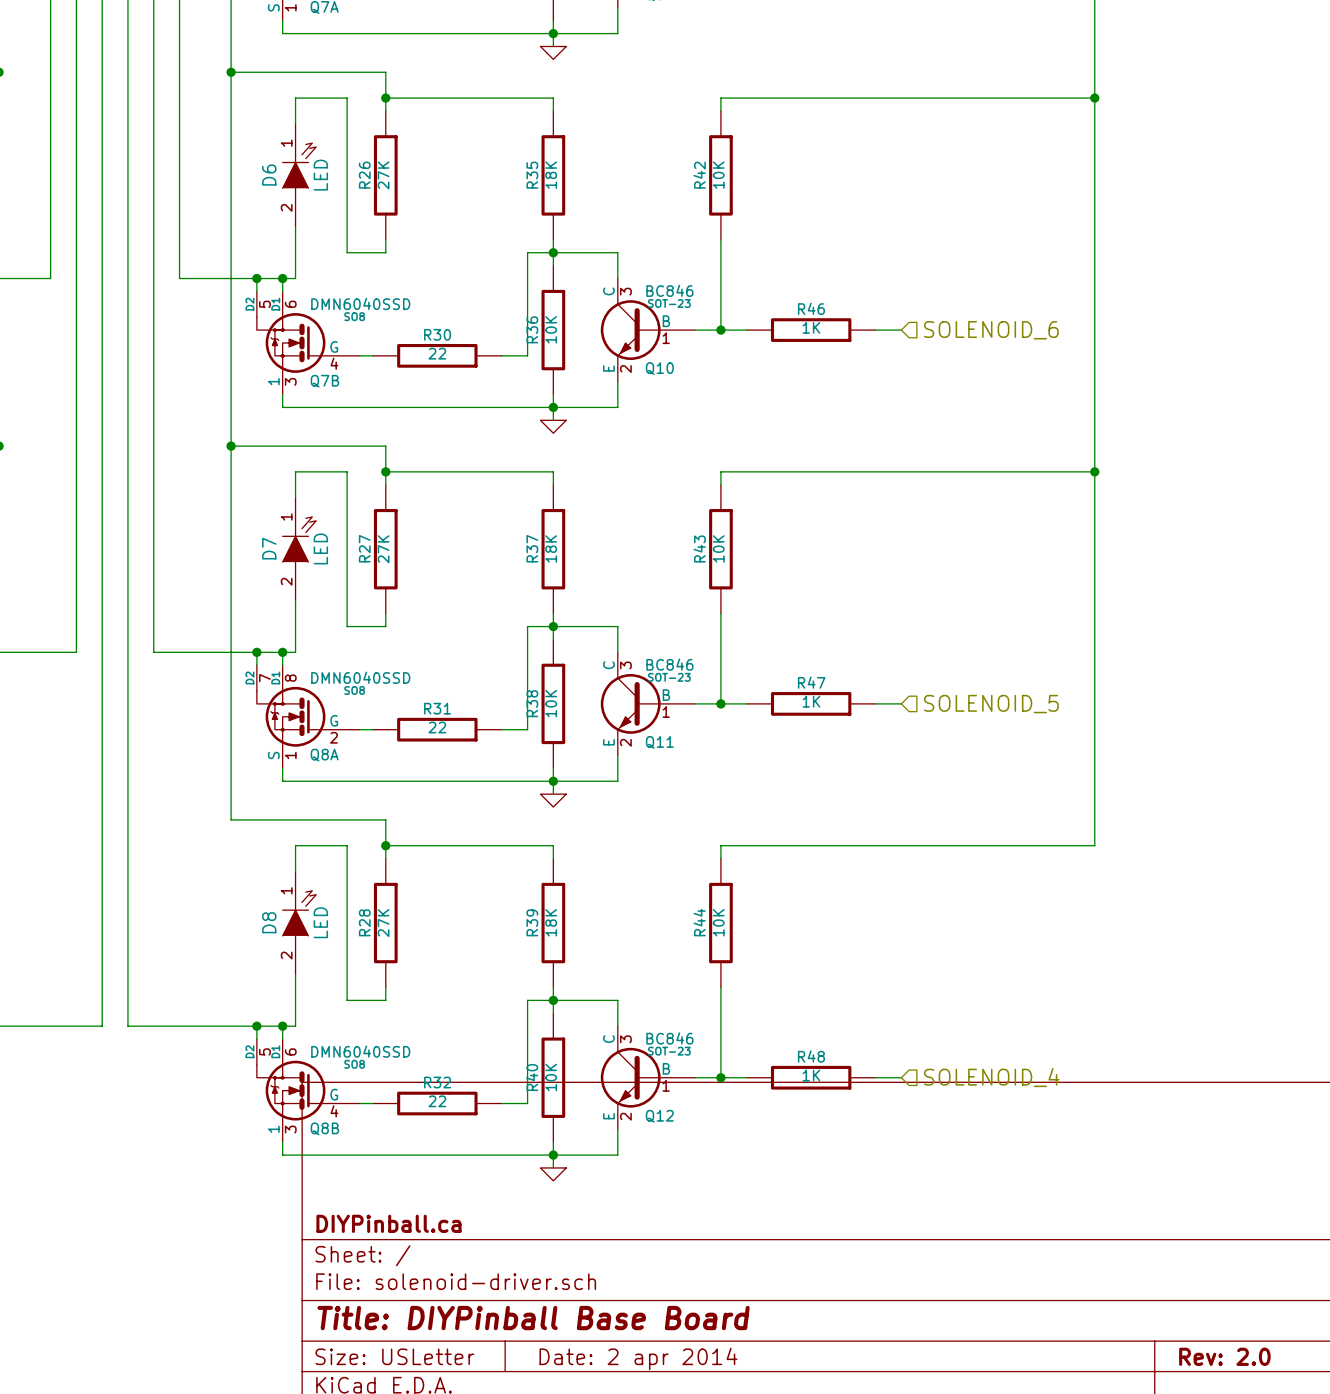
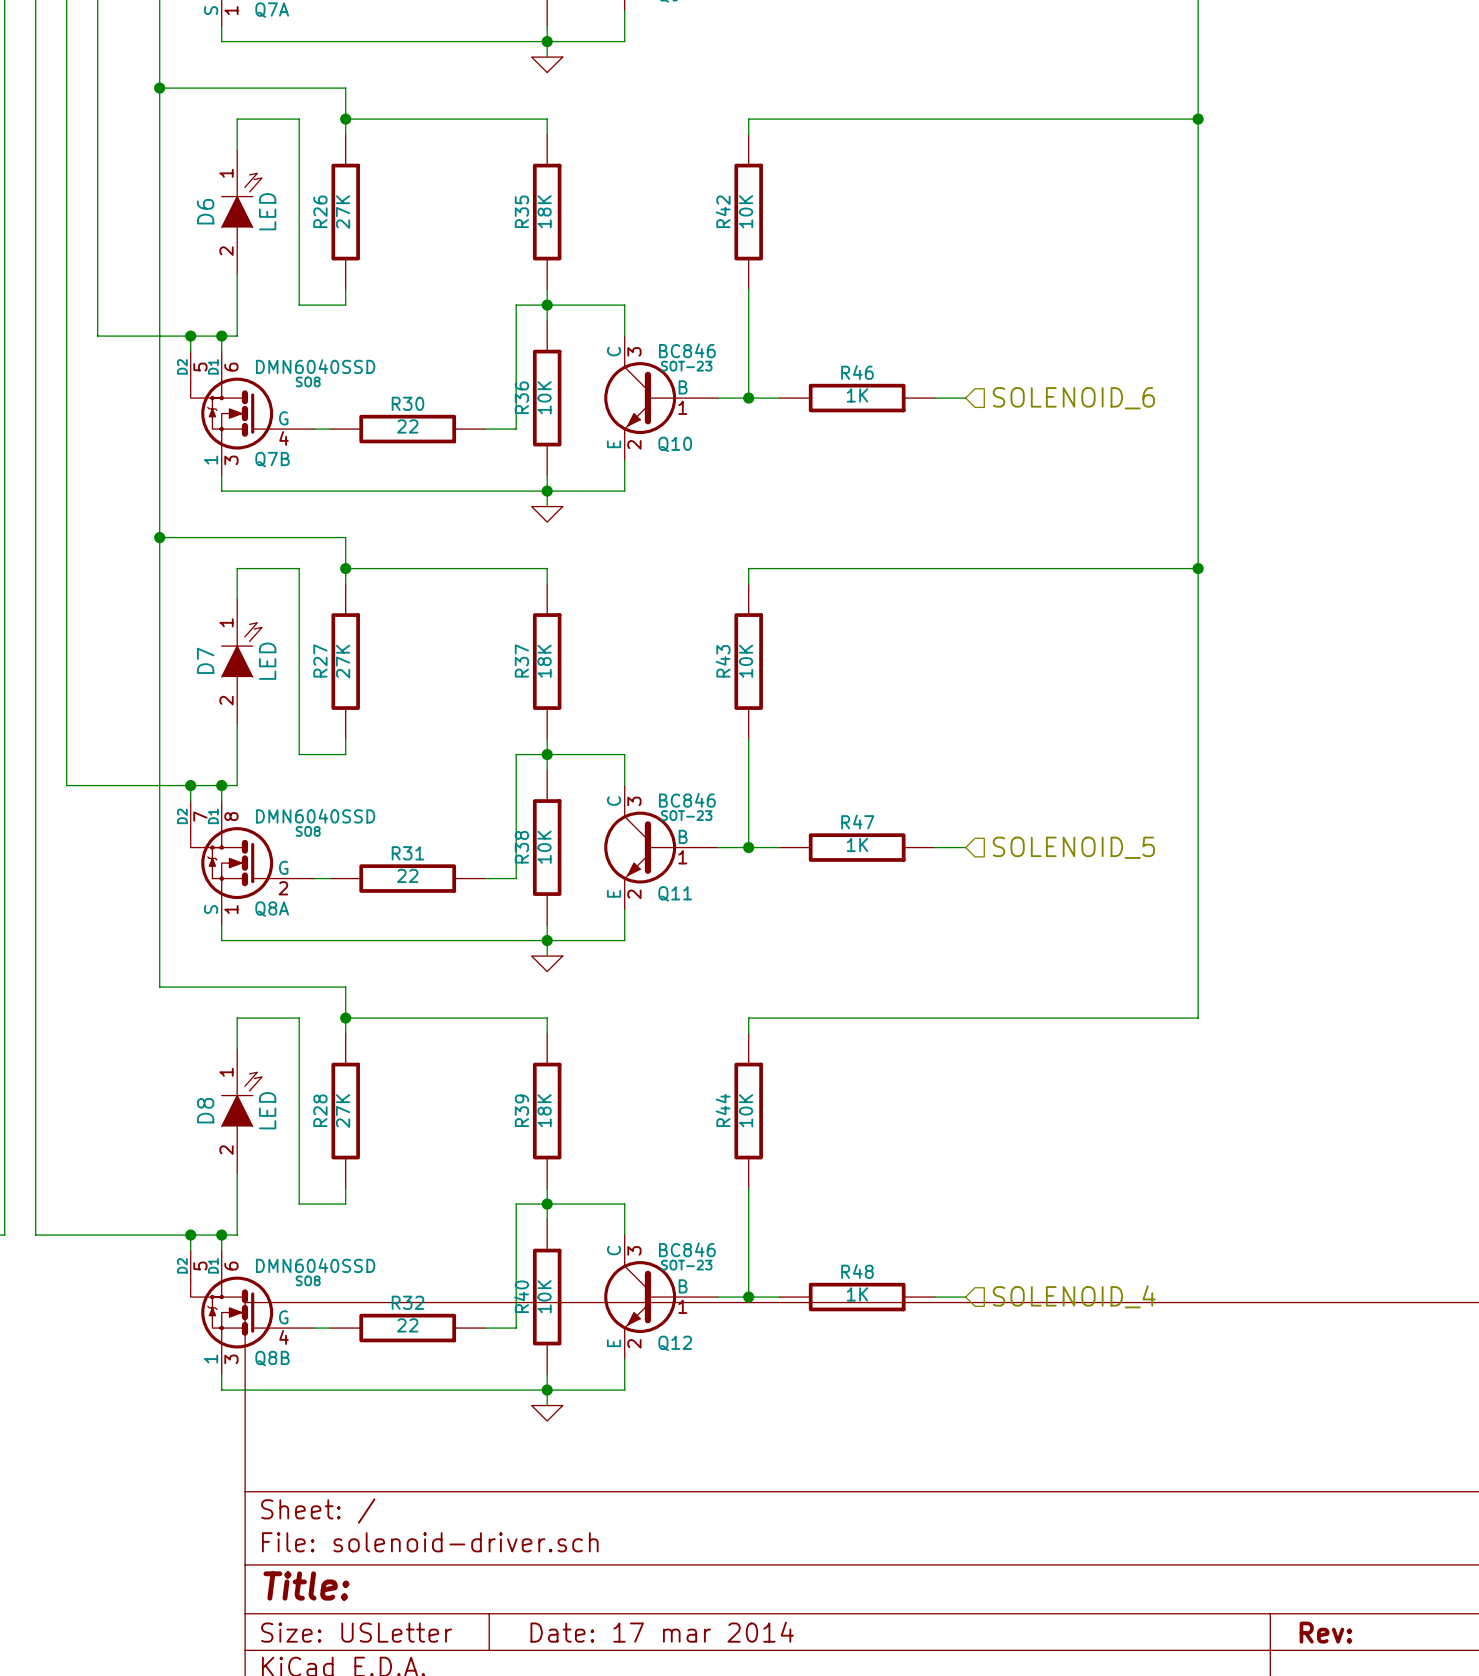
title block: DIYPinball.ca (388, 1223) -> none
title block: Title: DIYPinball Base Board (533, 1318) -> Title: (306, 1585)
title block: Rev: 2.0 (1224, 1356) -> Rev: (1325, 1632)
title block: Date: 2 apr 2014 (638, 1358) -> Date: 17 mar 2014 (662, 1632)

